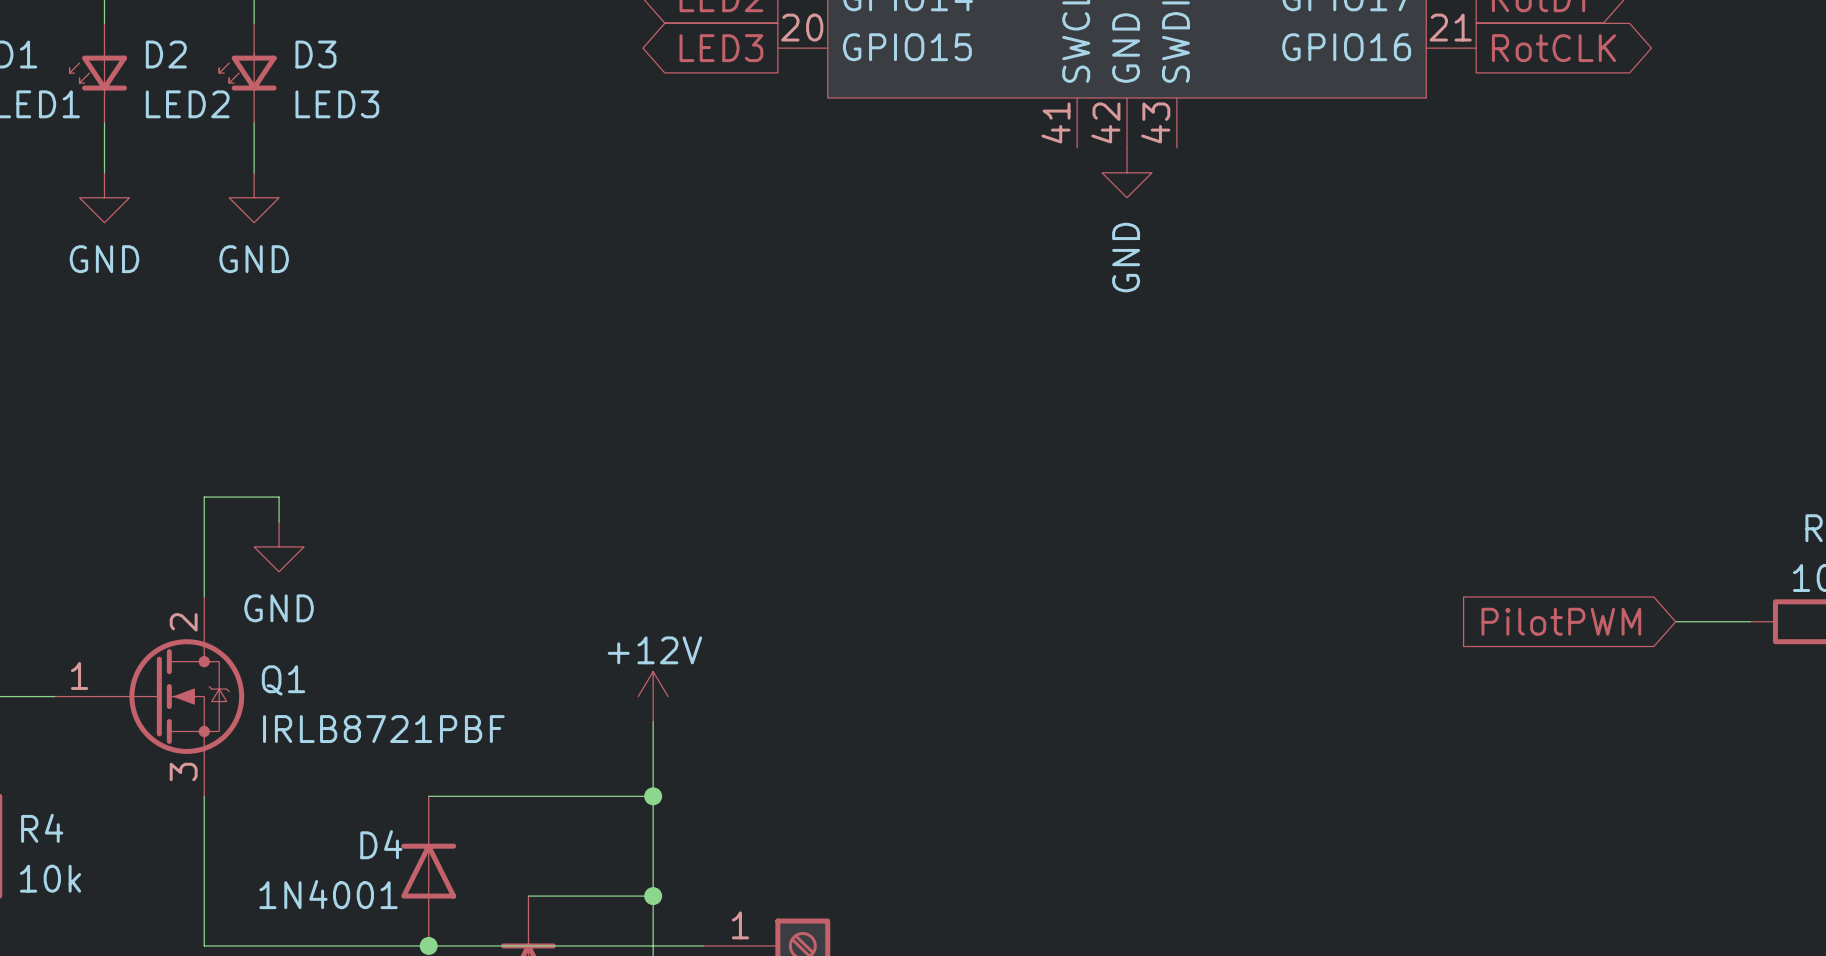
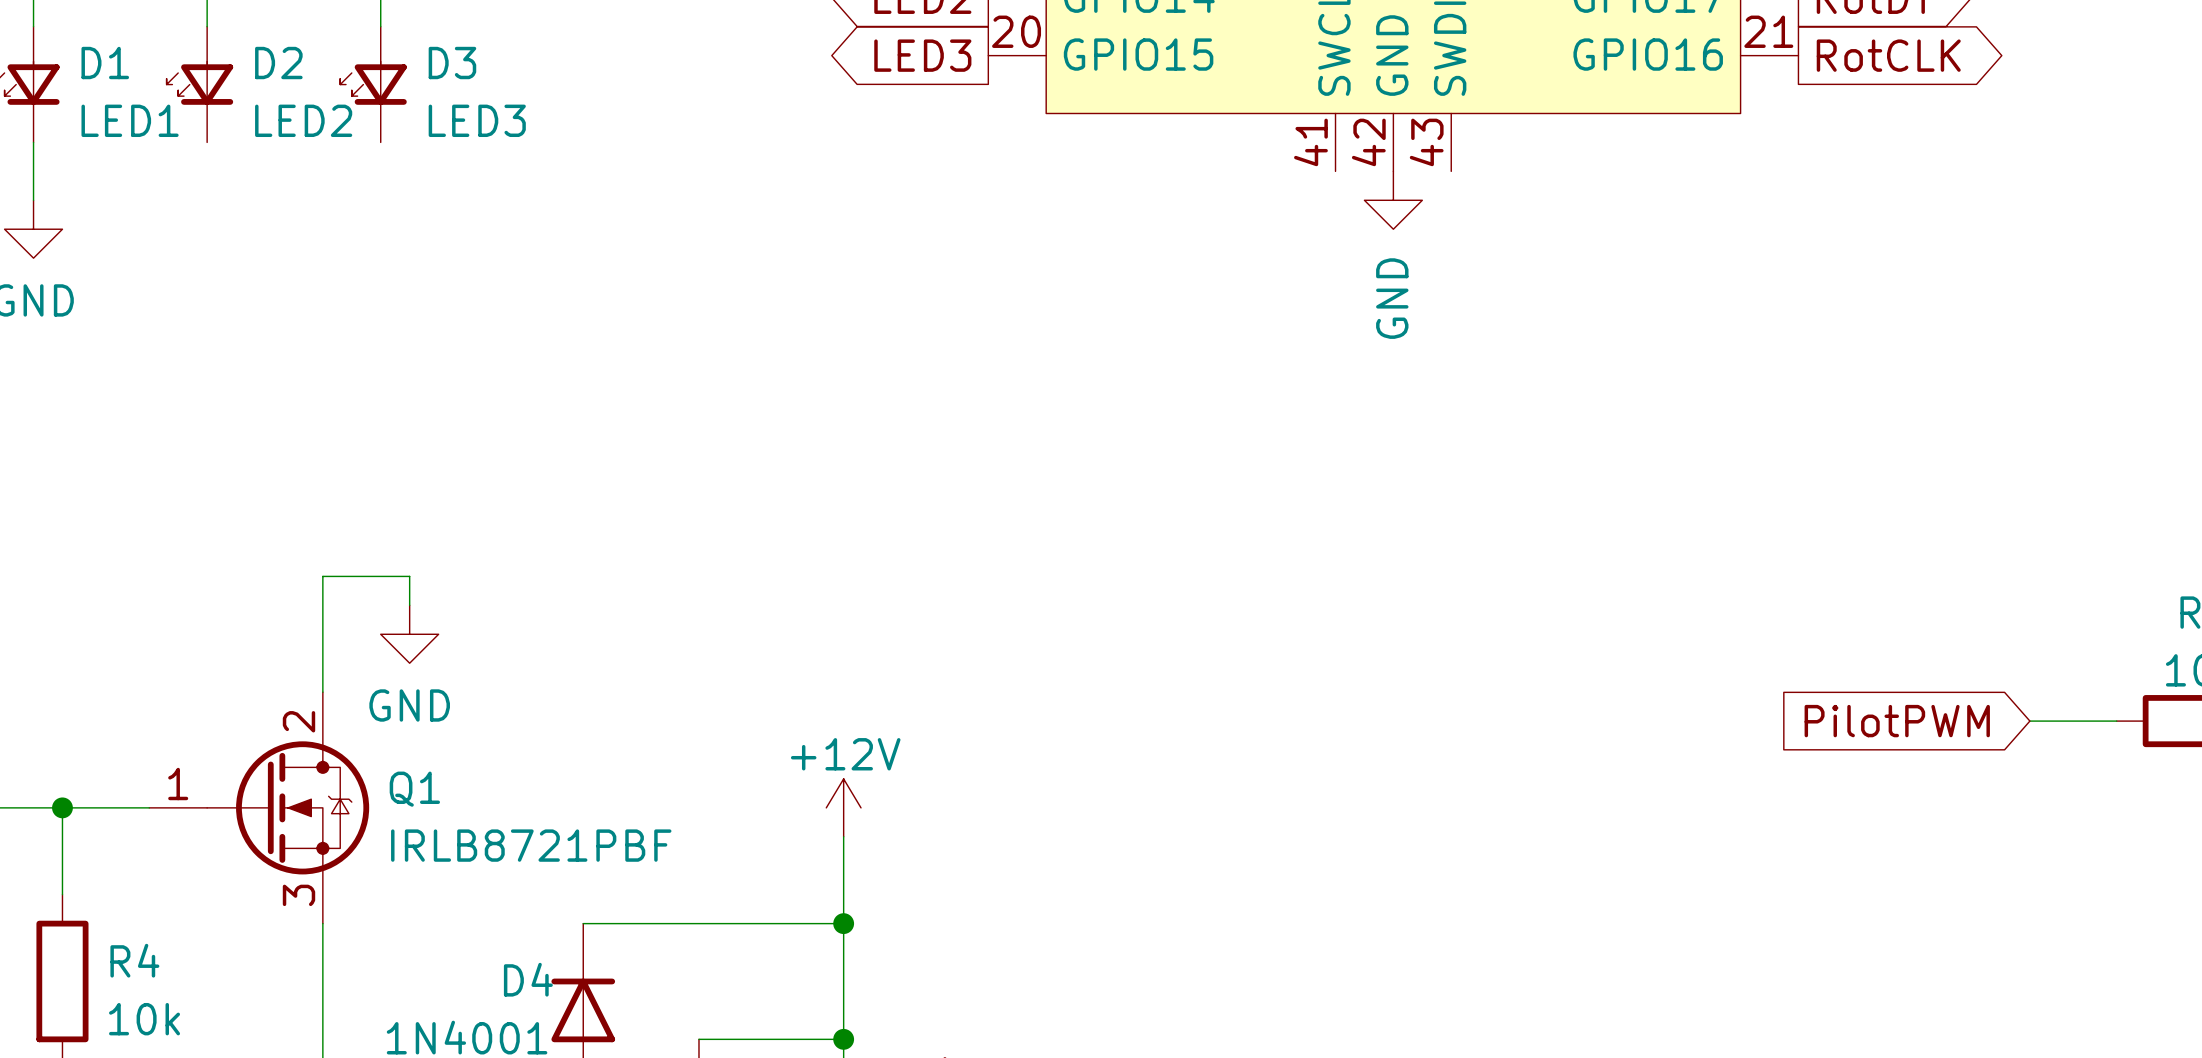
wire: (104, 122) (104, 172) -> none
wire: (254, 122) (254, 172) -> none
power symbol: GND (104, 197) -> none
power symbol: GND (254, 197) -> none

